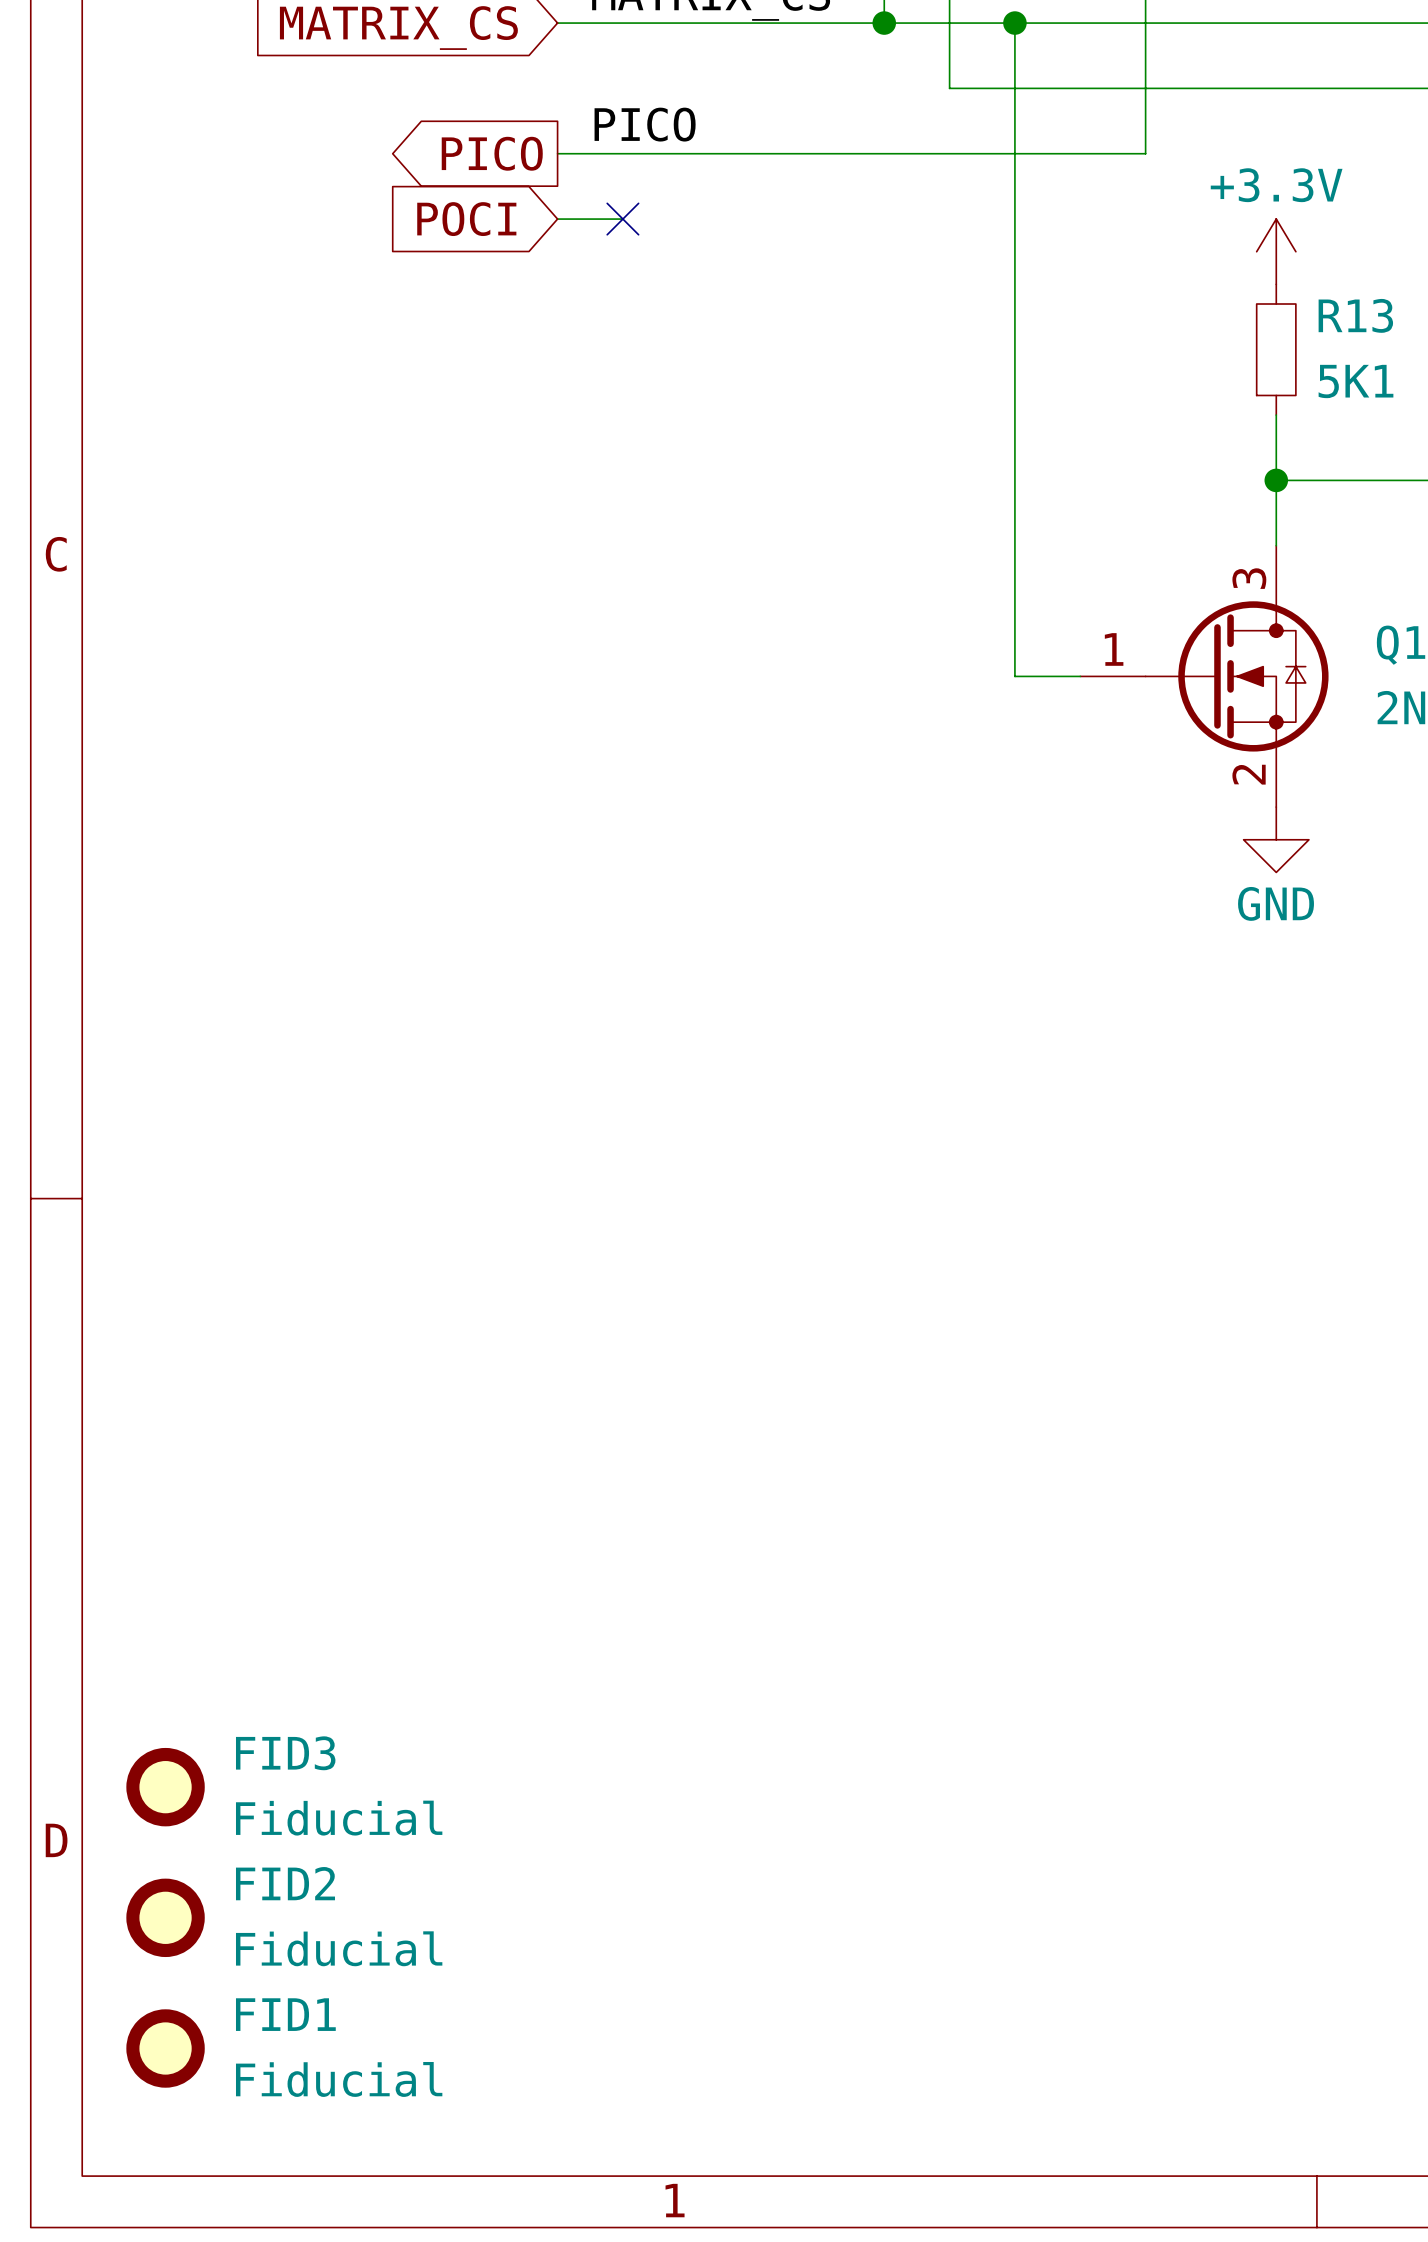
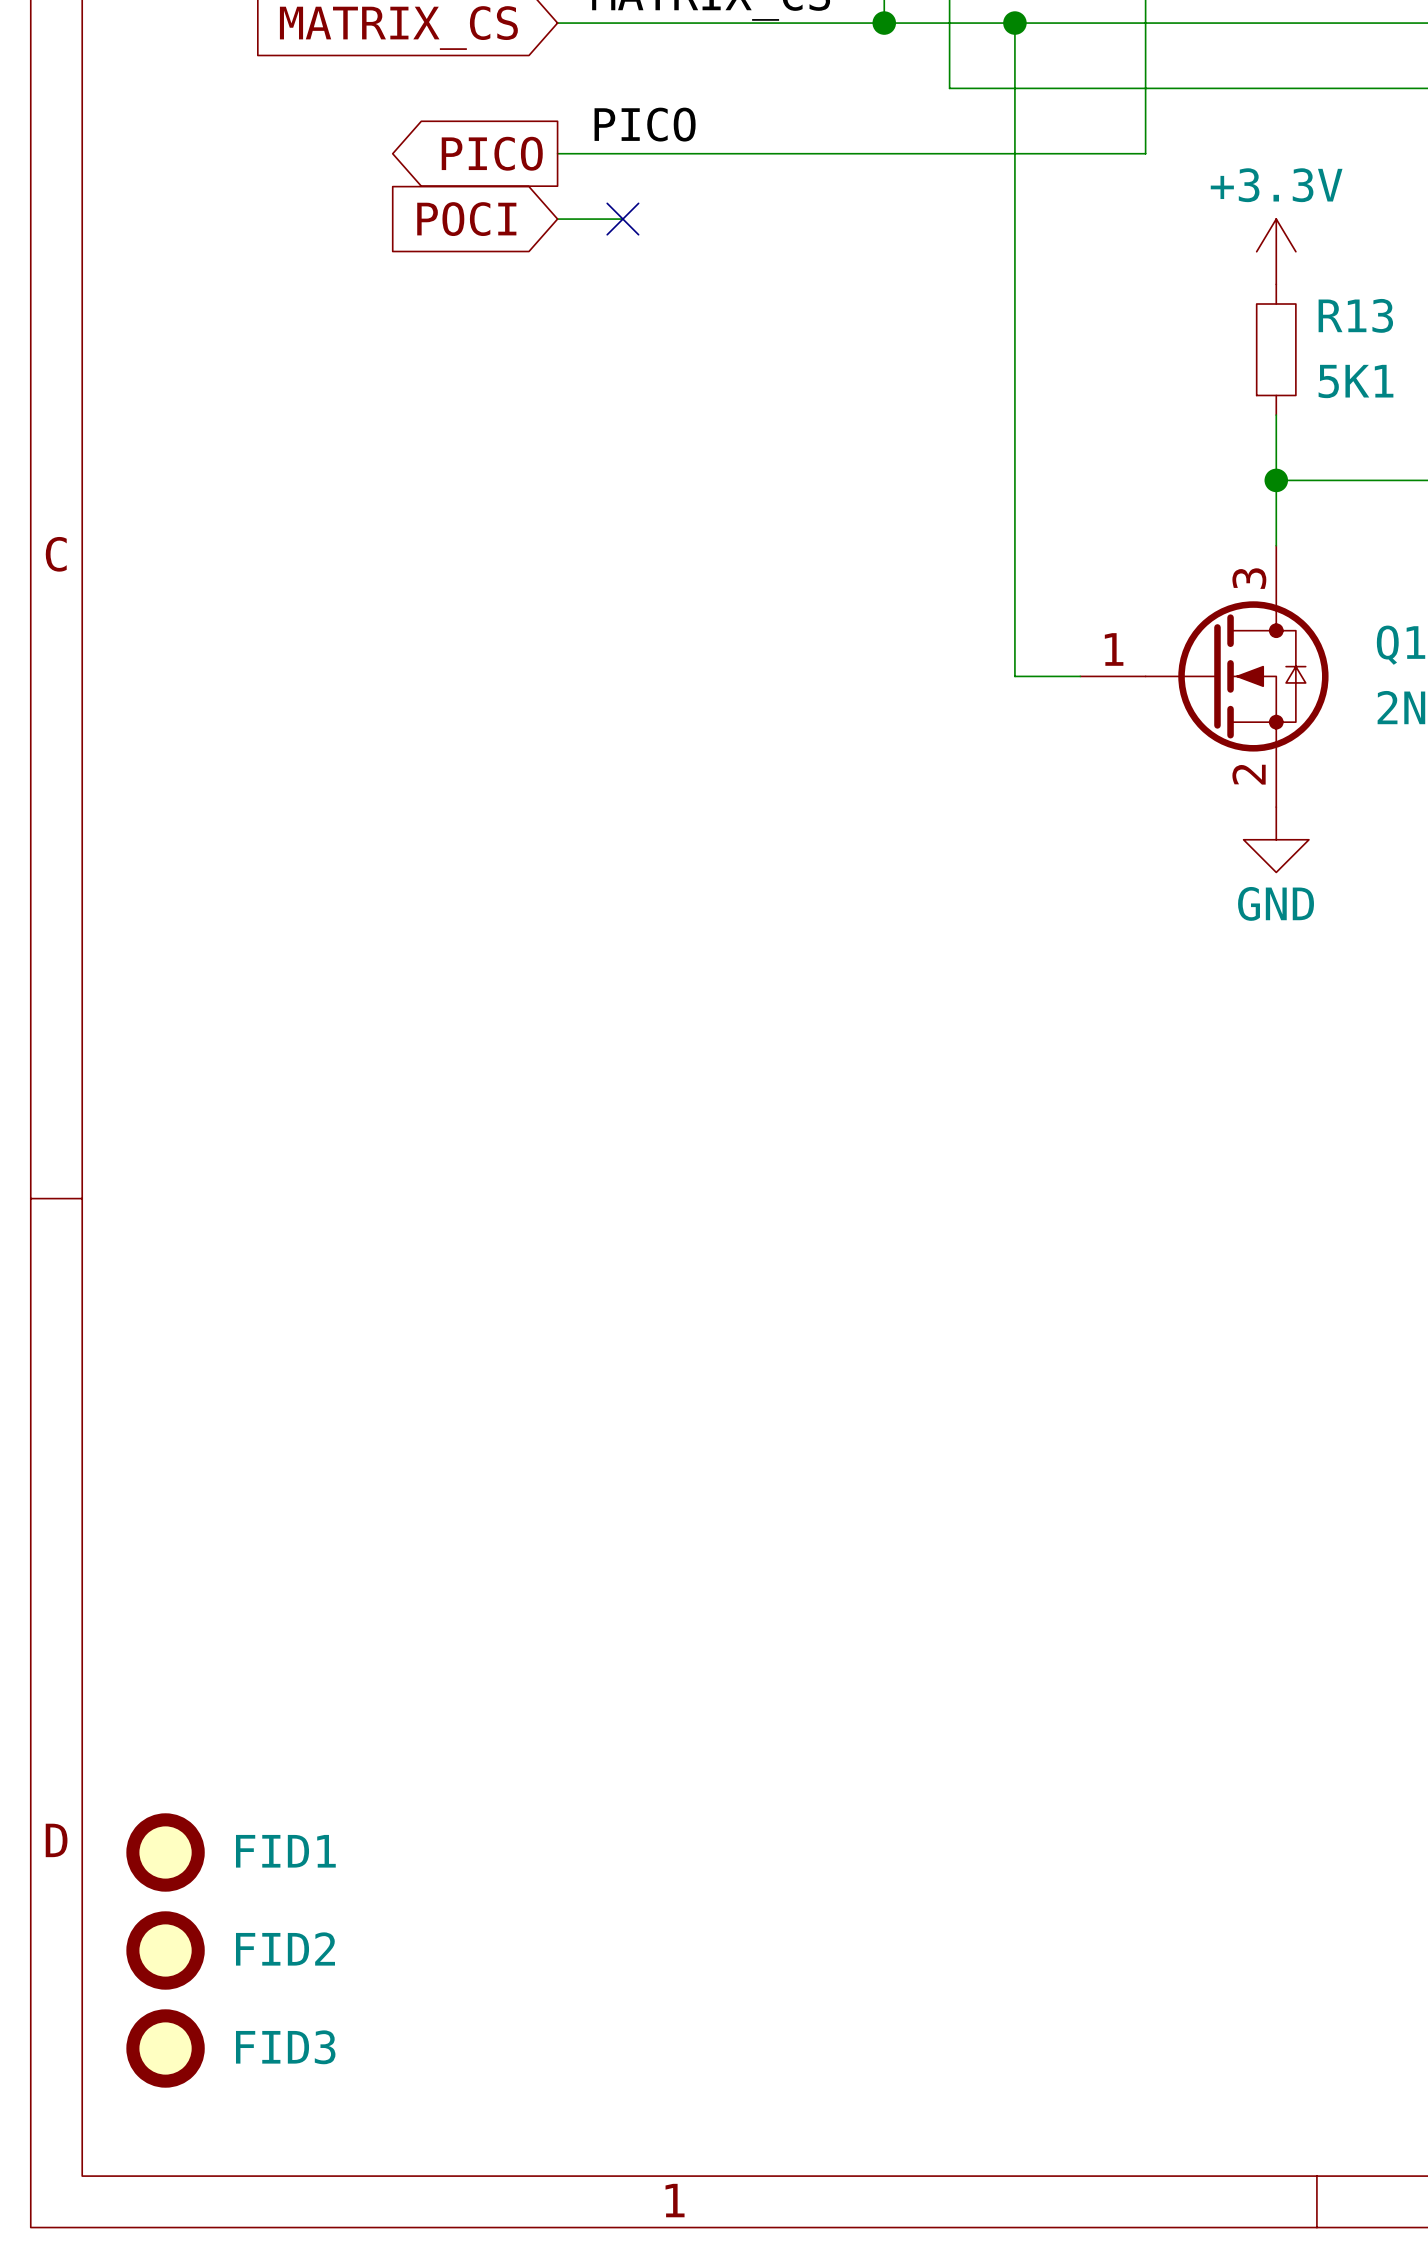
FID3: Fiducial (165, 1787) -> none
FID1: none -> (165, 1852)
FID2 name position: FID2 (285, 1883) -> FID2 (285, 1948)
FID2 position: (165, 1917) -> (165, 1950)
FID2 value: Fiducial (339, 1948) -> none
FID1 name: FID1 (285, 2014) -> FID3 (285, 2047)
FID1 value: Fiducial (339, 2079) -> none

